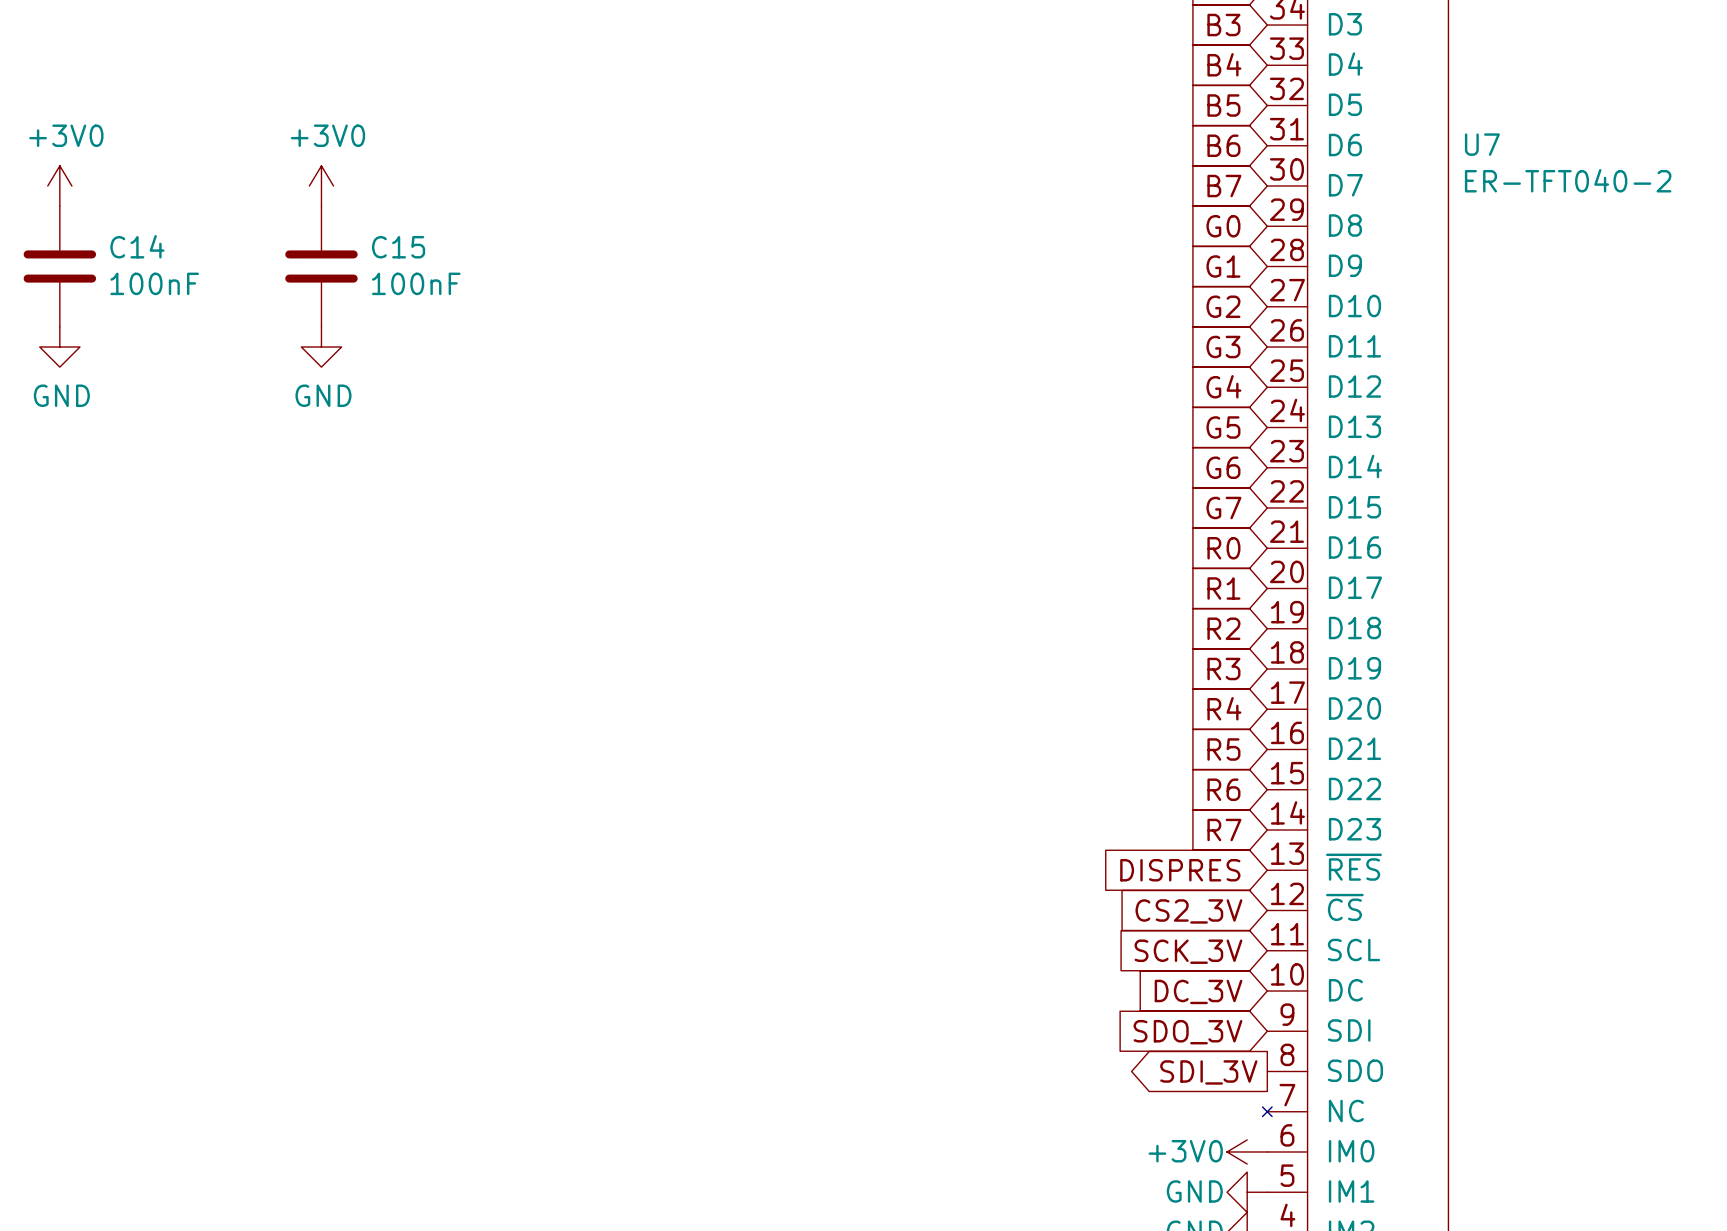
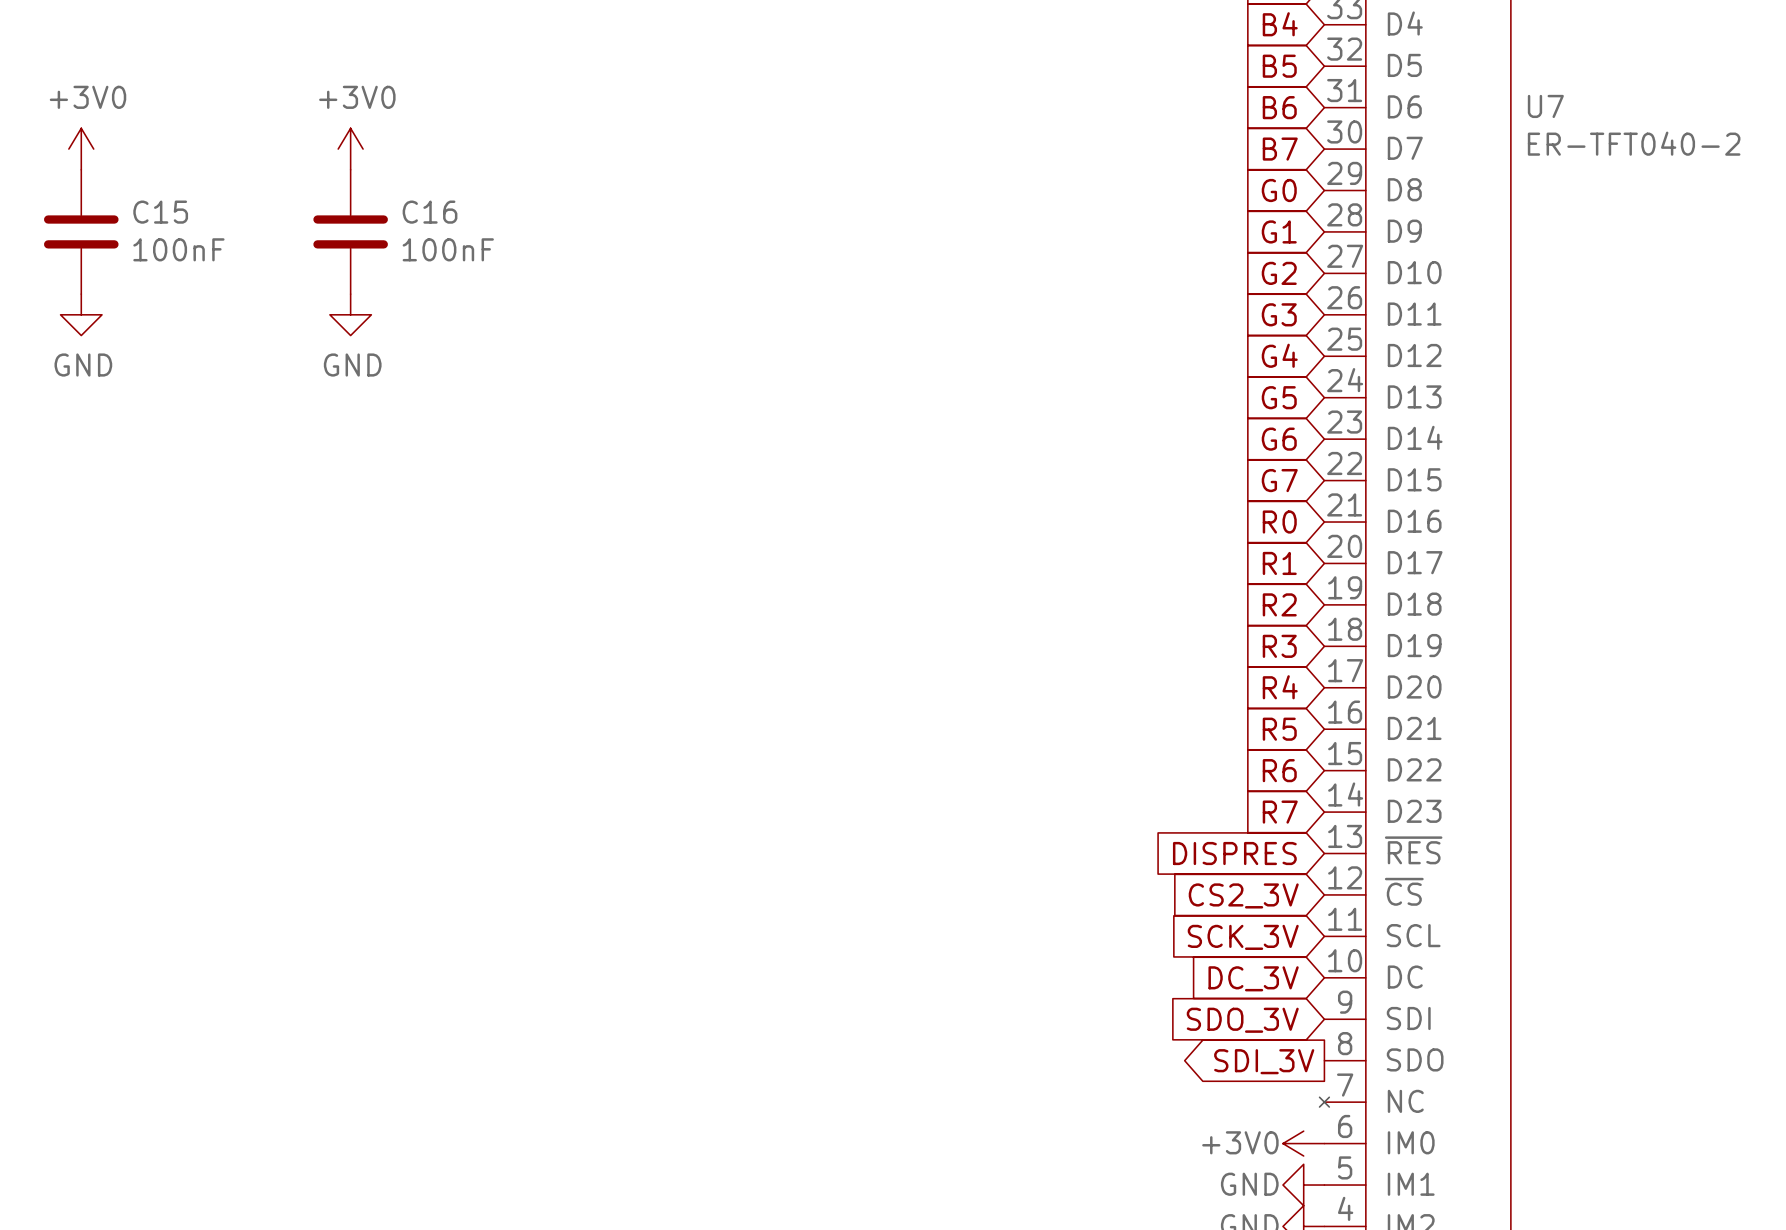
C14 name: C14 (137, 246) -> C15 (160, 212)
C15 name: C15 (398, 247) -> C16 (430, 212)

